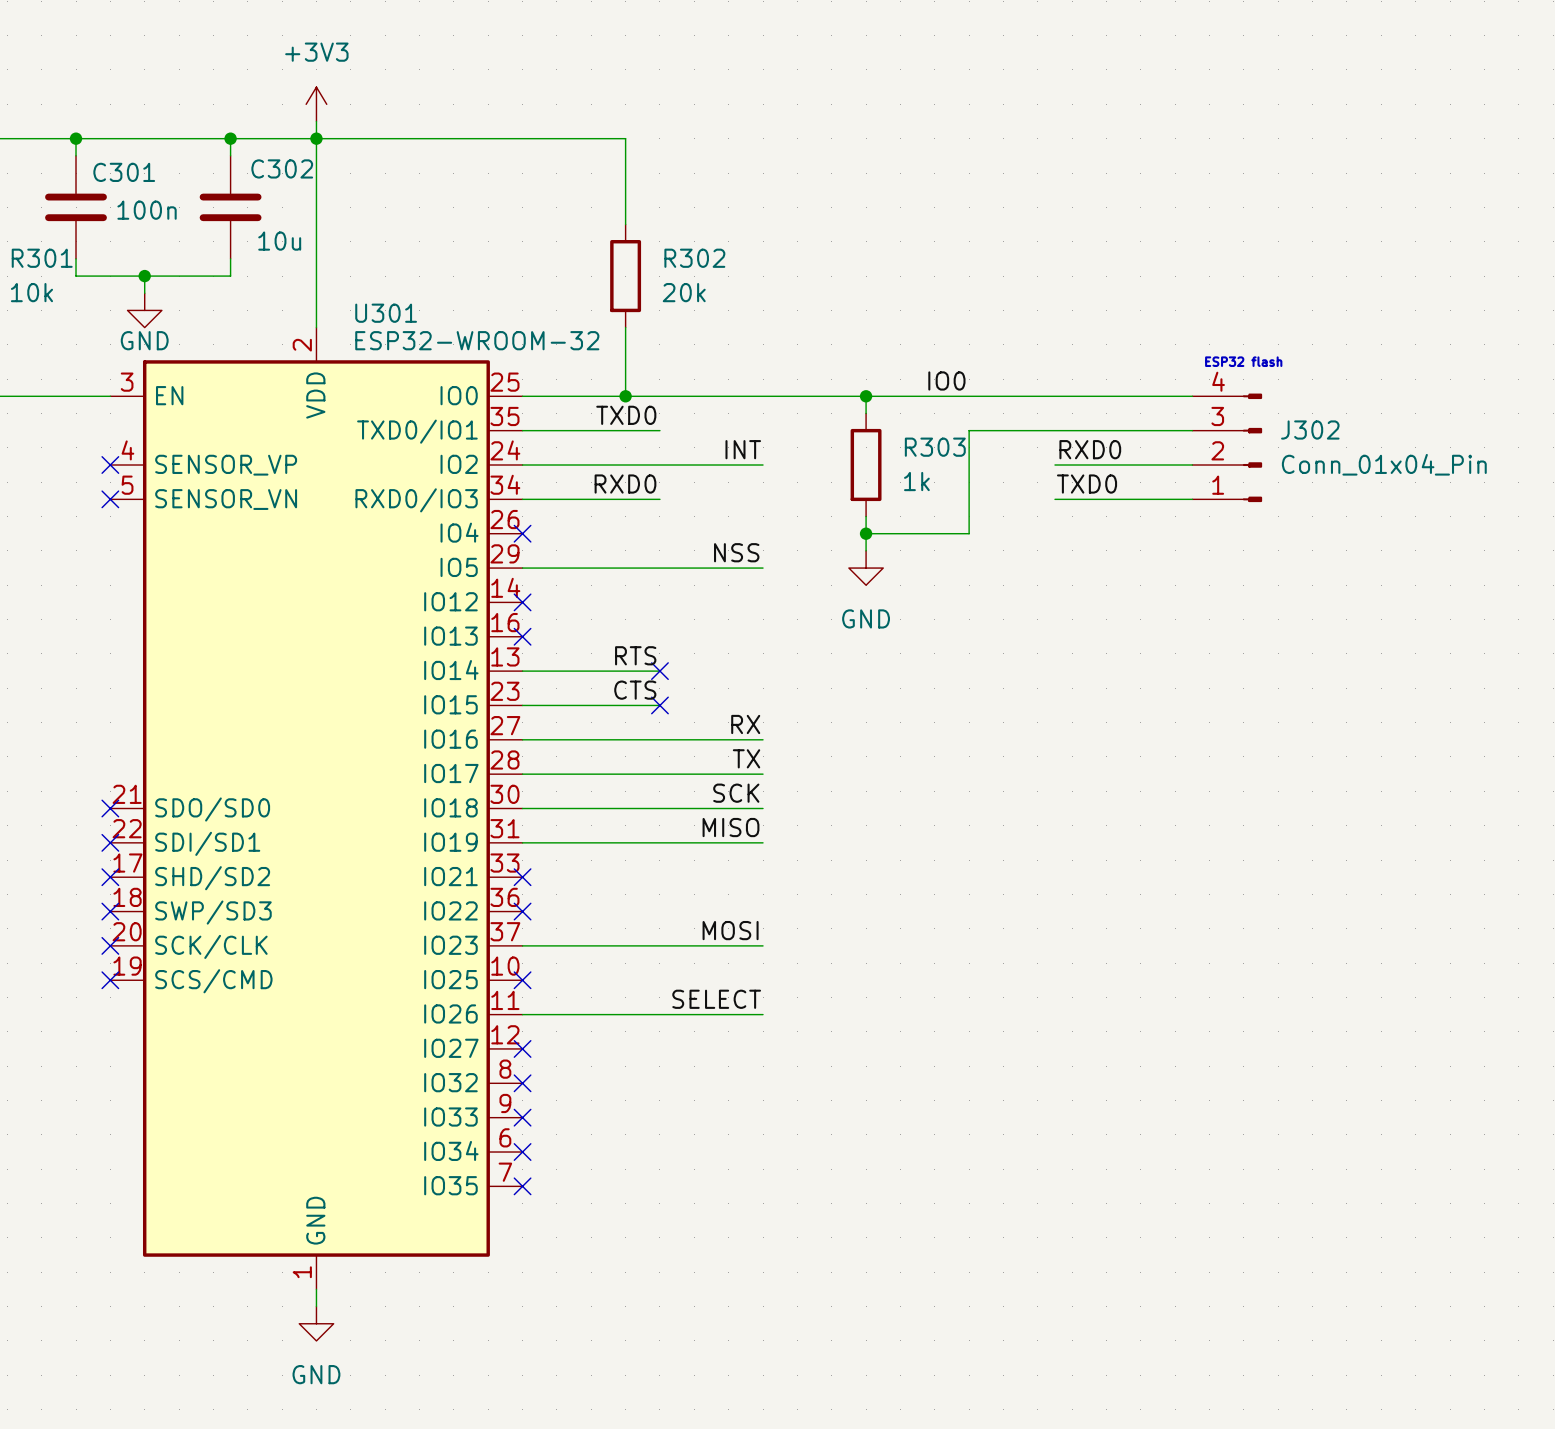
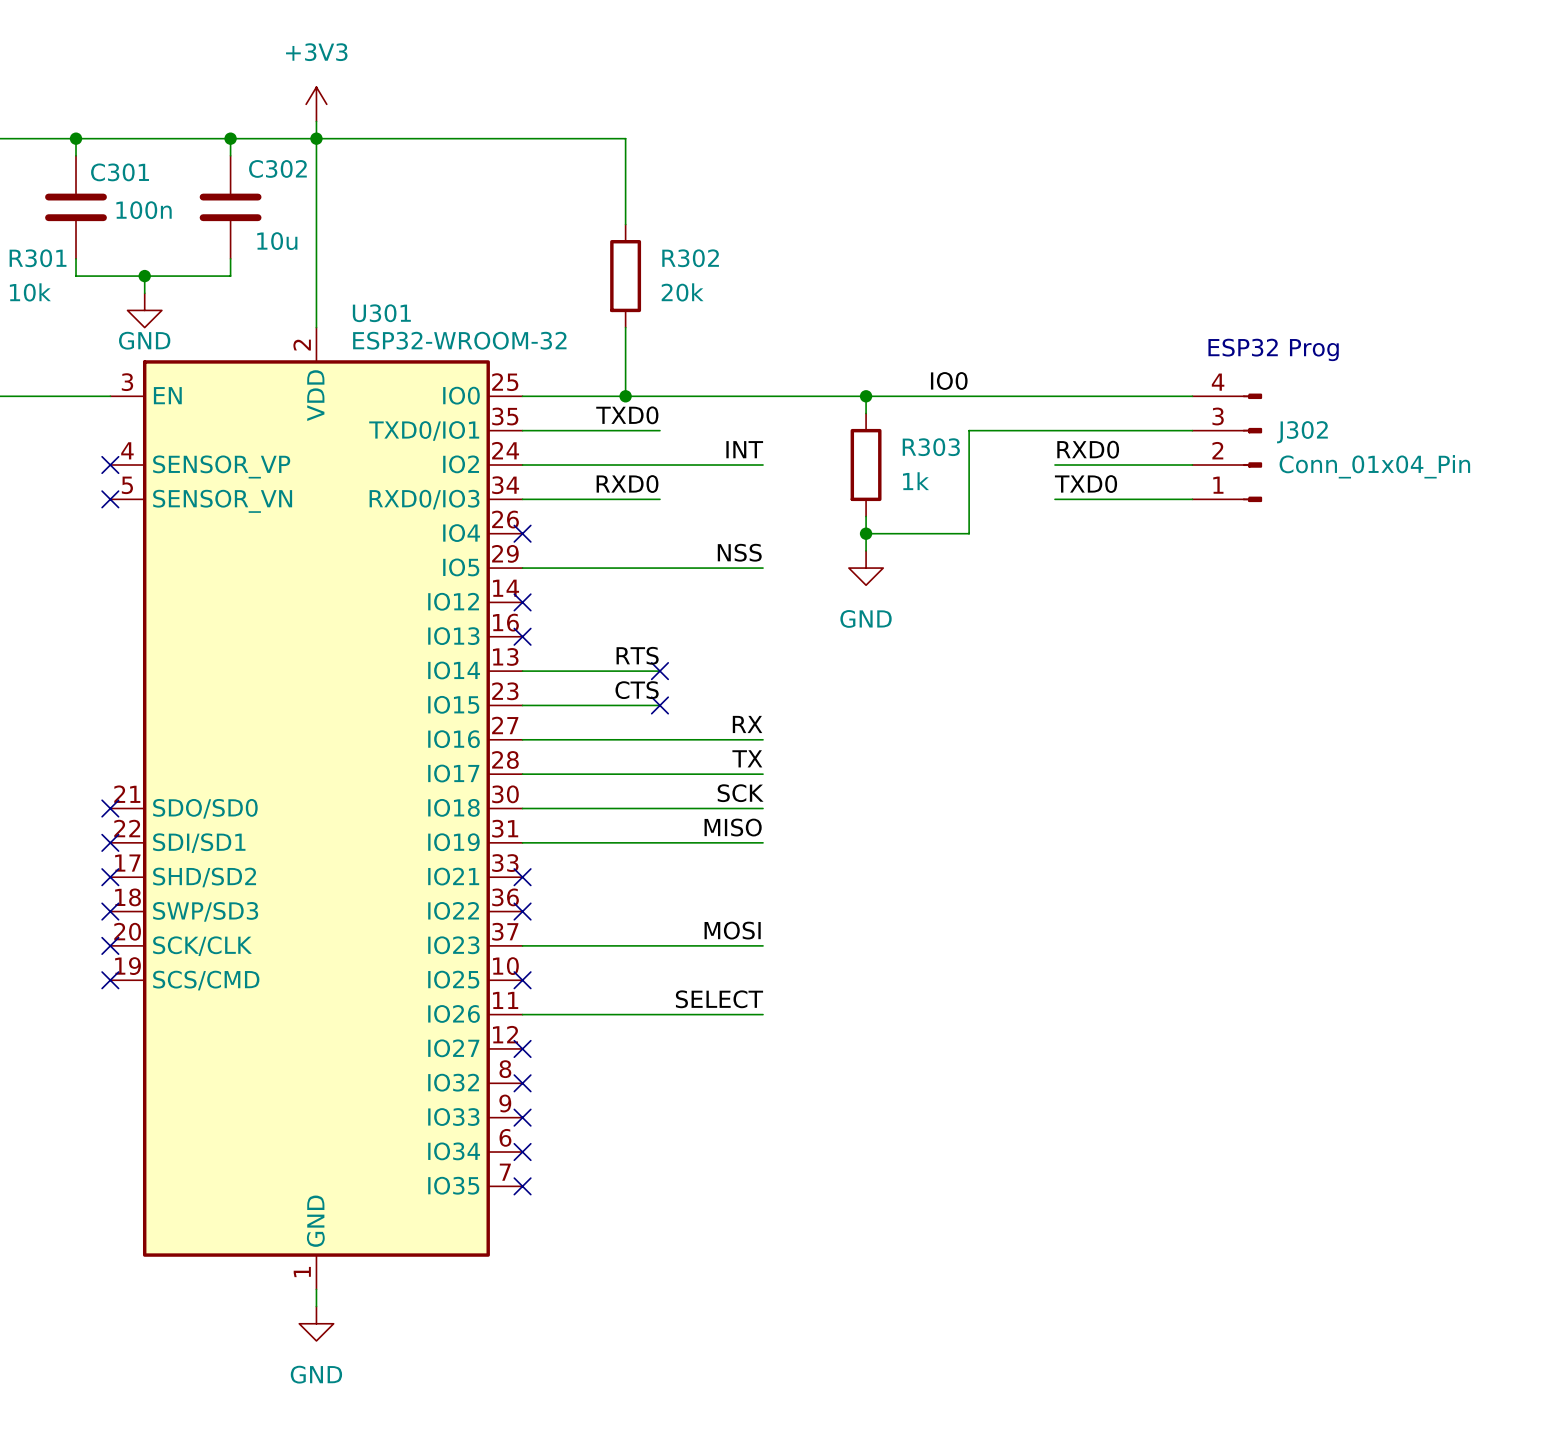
text: none -> ESP32 Prog (1273, 349)
text: ESP32 flash (1243, 361) -> none

